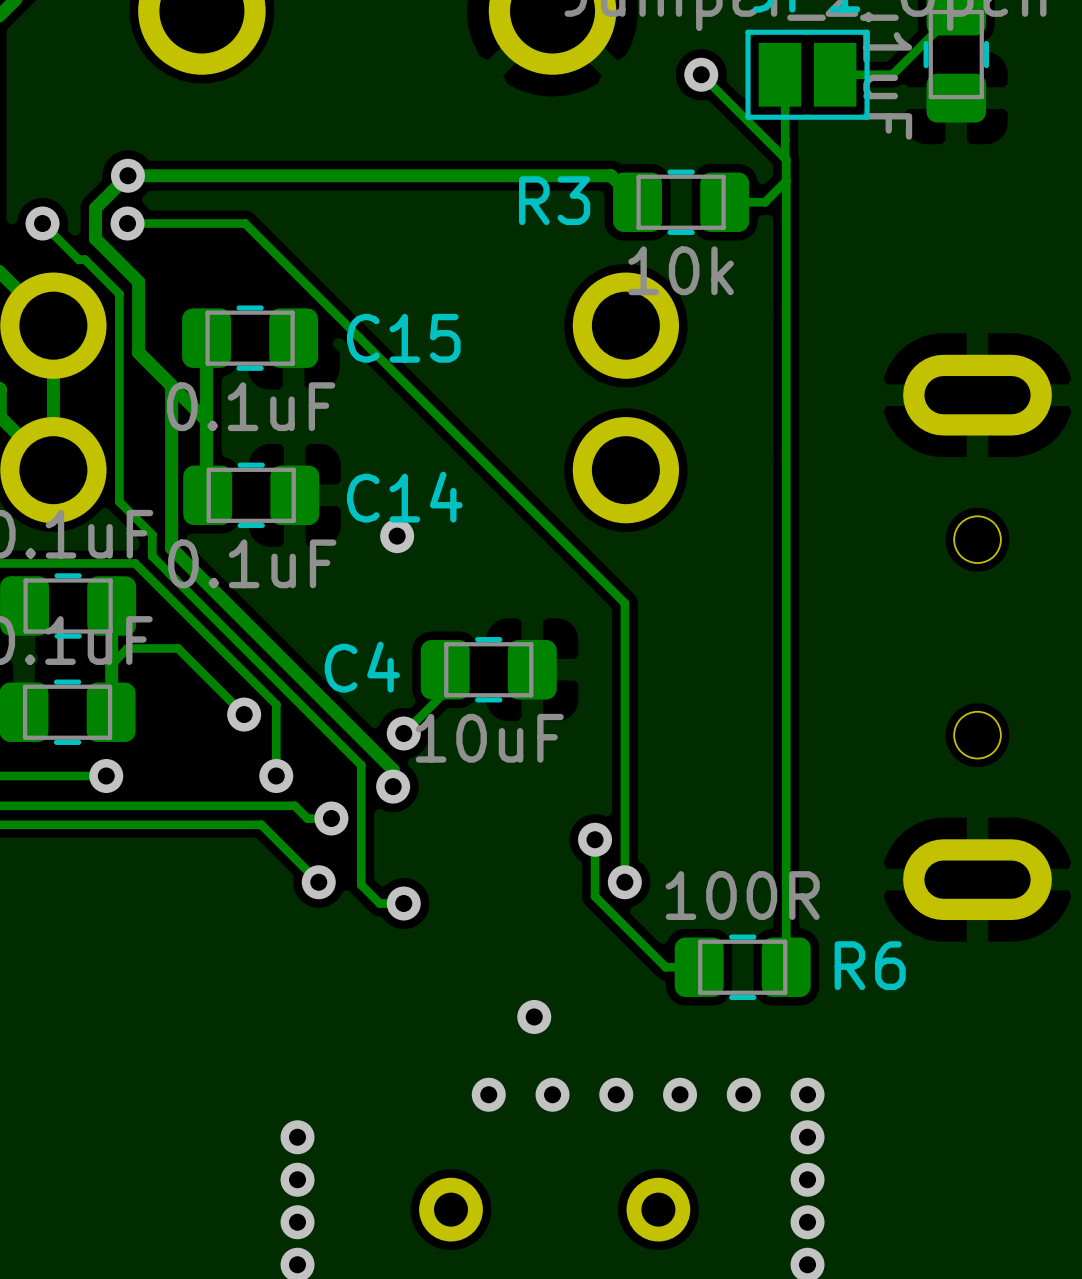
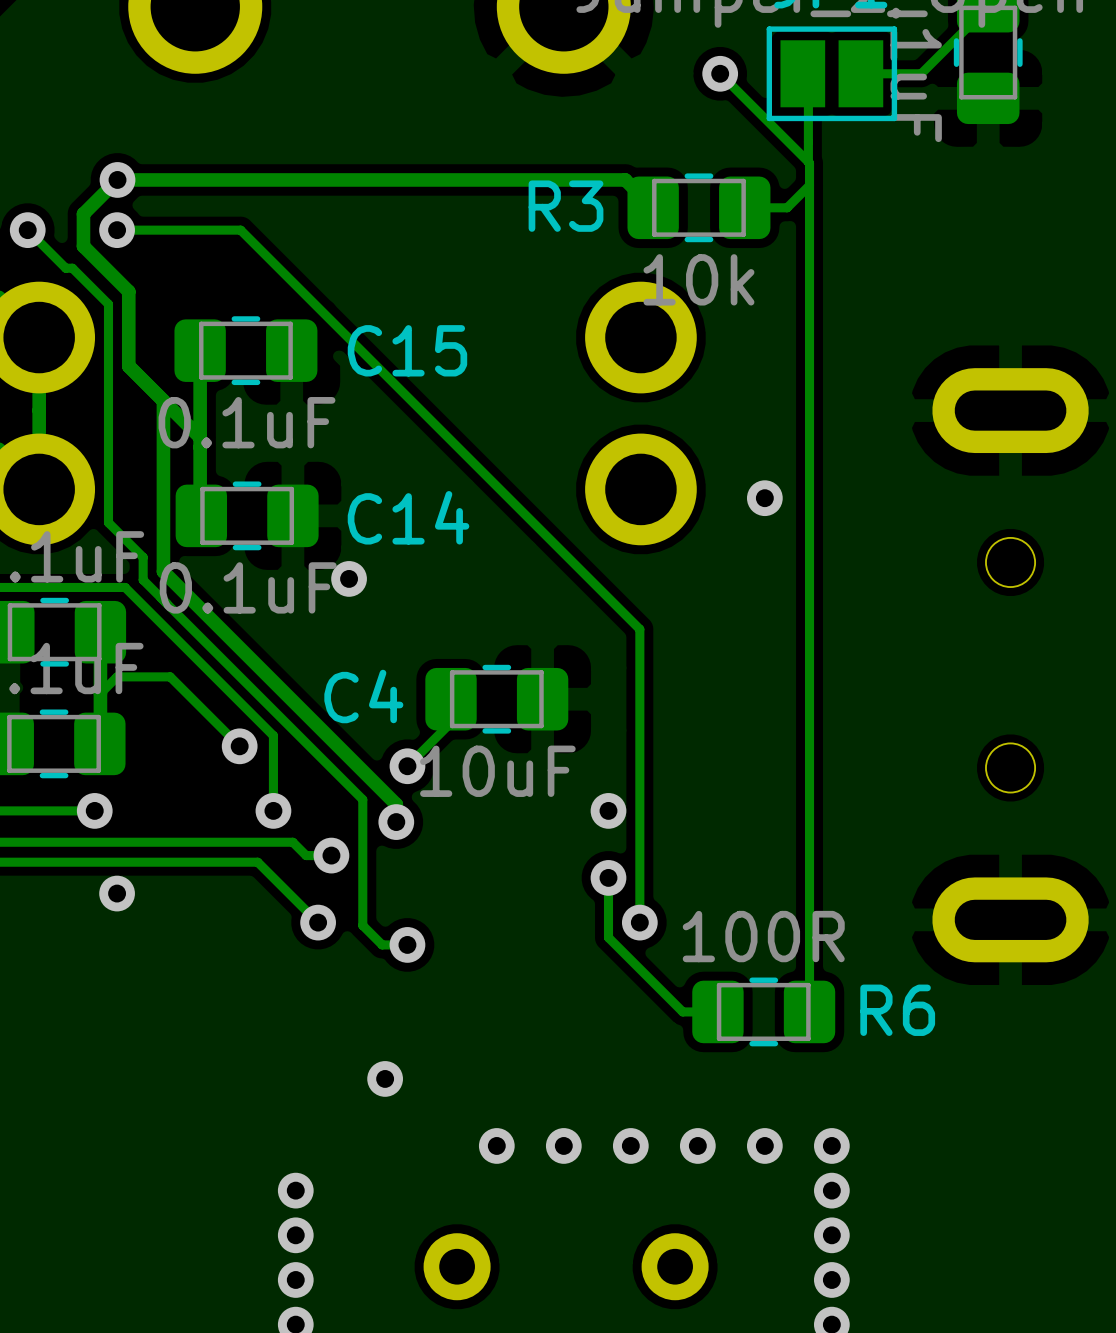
via: none -> (764, 498)
via position: (397, 536) -> (349, 578)
via: none -> (608, 810)
via: none -> (117, 893)
via: (534, 1016) -> none
via: none -> (385, 1078)

